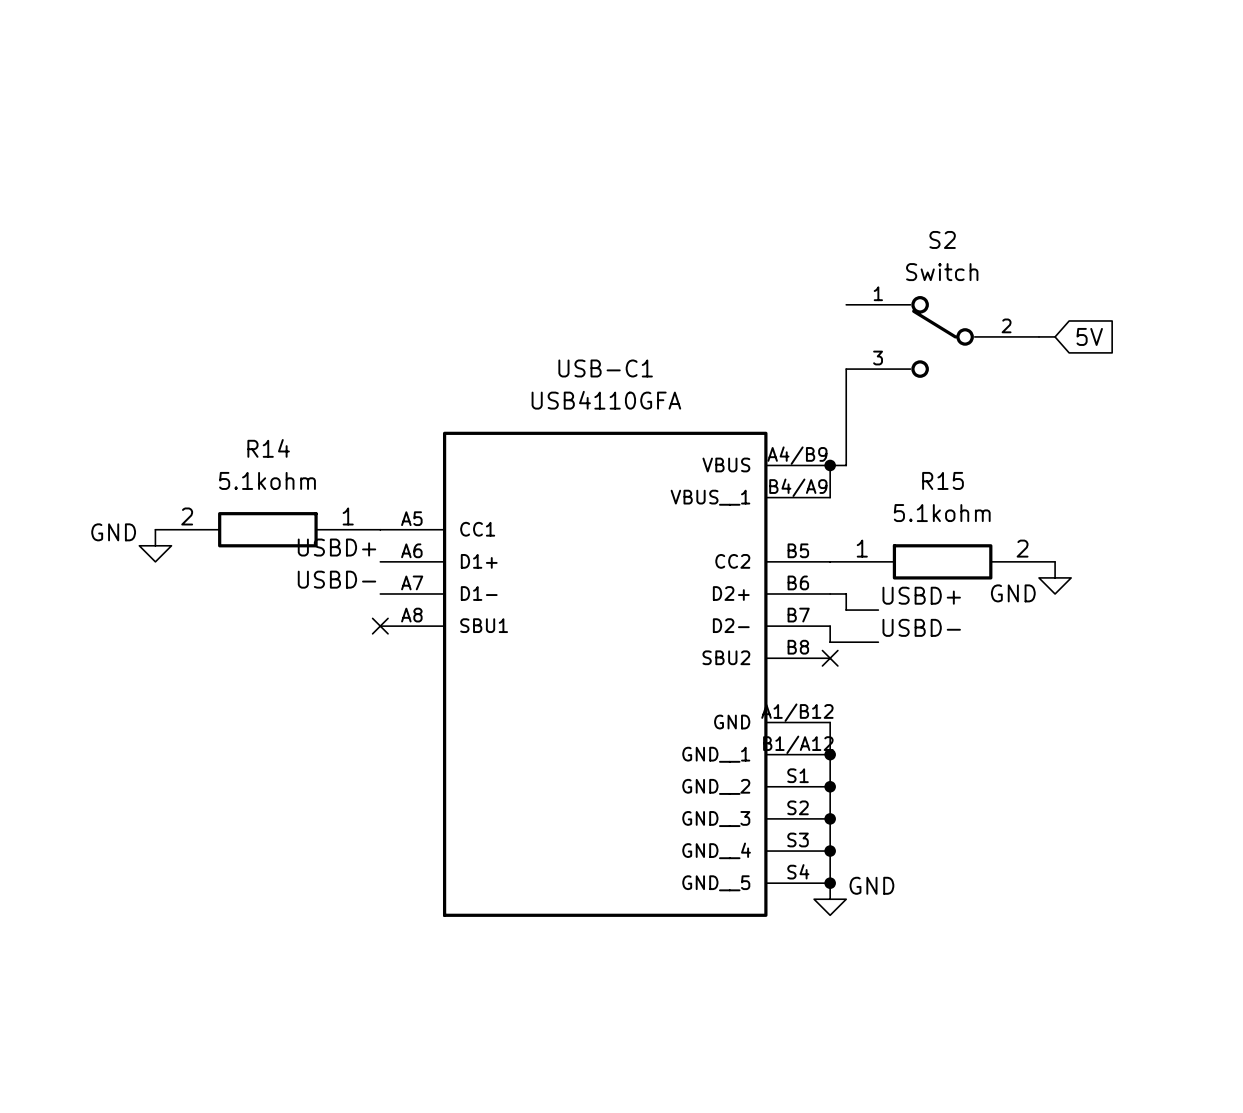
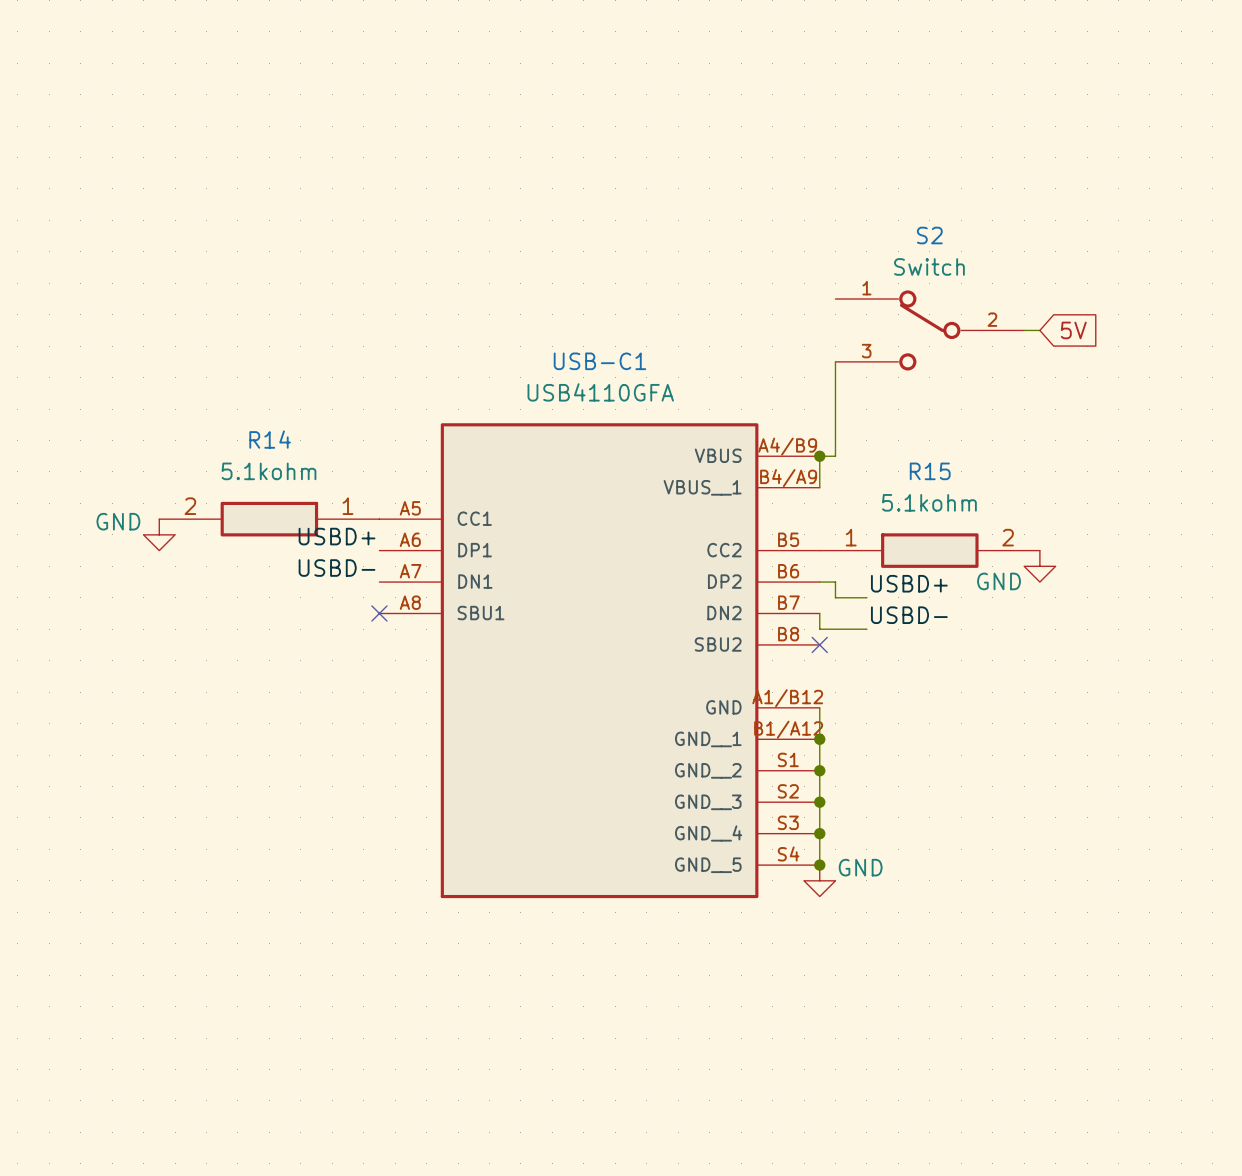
USB-C1 pin name: D1+ (479, 561) -> DP1 (475, 550)
USB-C1 pin name: D1- (479, 593) -> DN1 (475, 581)
USB-C1 pin name: D2+ (731, 593) -> DP2 (724, 581)
USB-C1 pin name: D2- (731, 625) -> DN2 (724, 613)

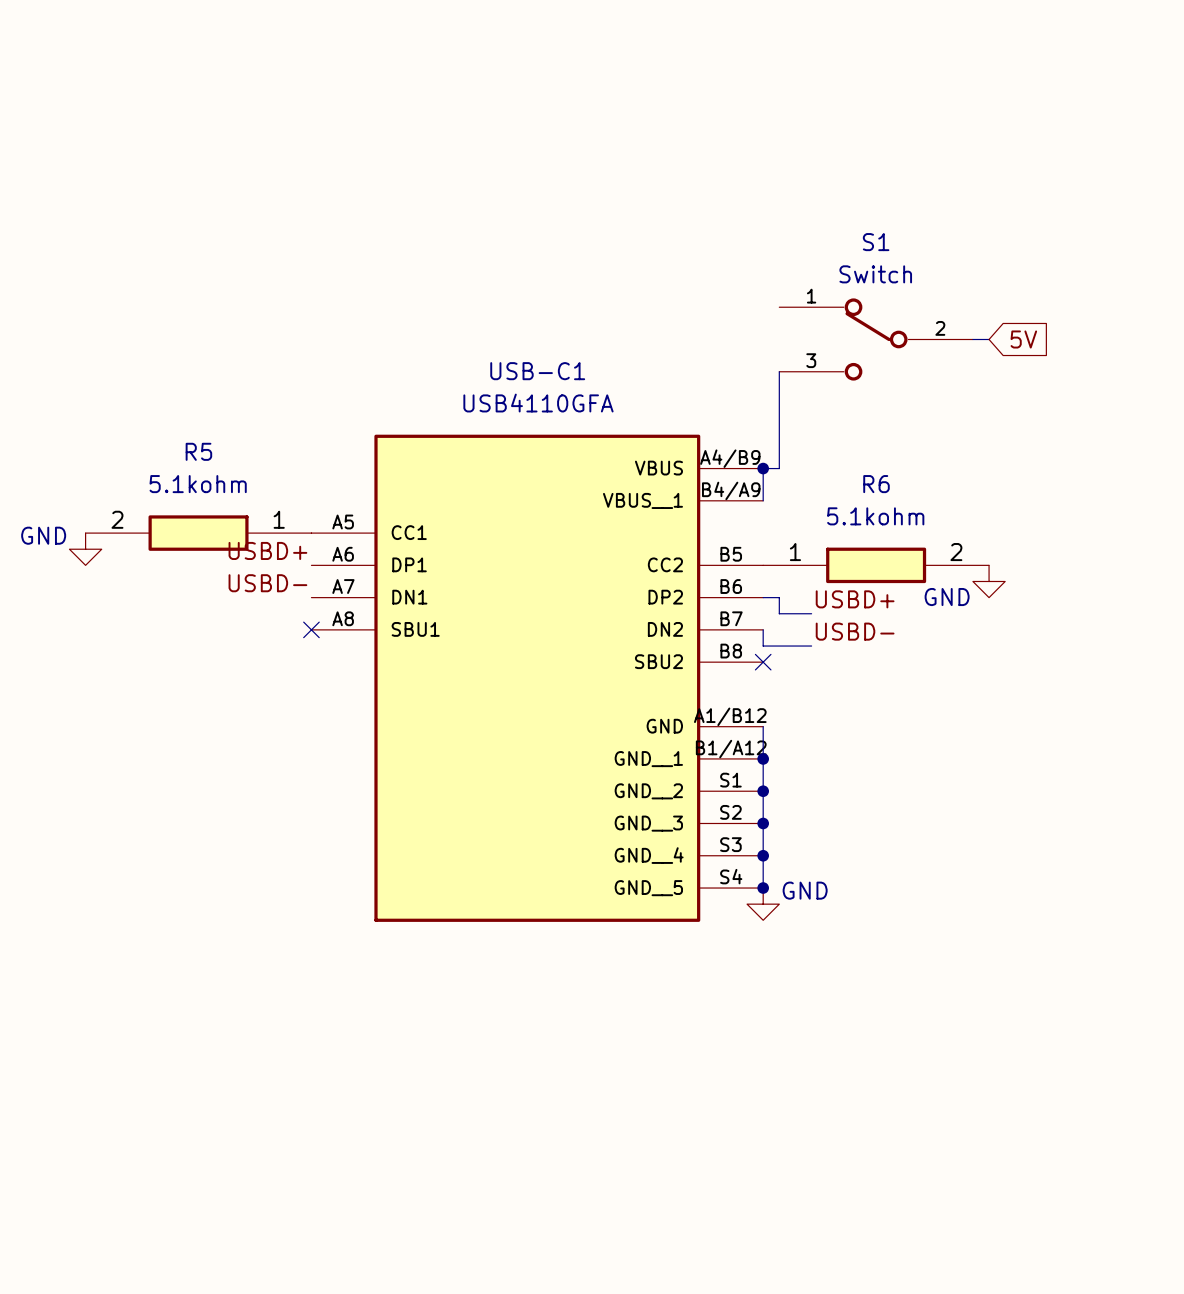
S2 name: S2 (929, 235) -> S1 (876, 242)
R14 name: R14 (270, 439) -> R5 (198, 451)
R15 name: R15 (930, 471) -> R6 (876, 484)

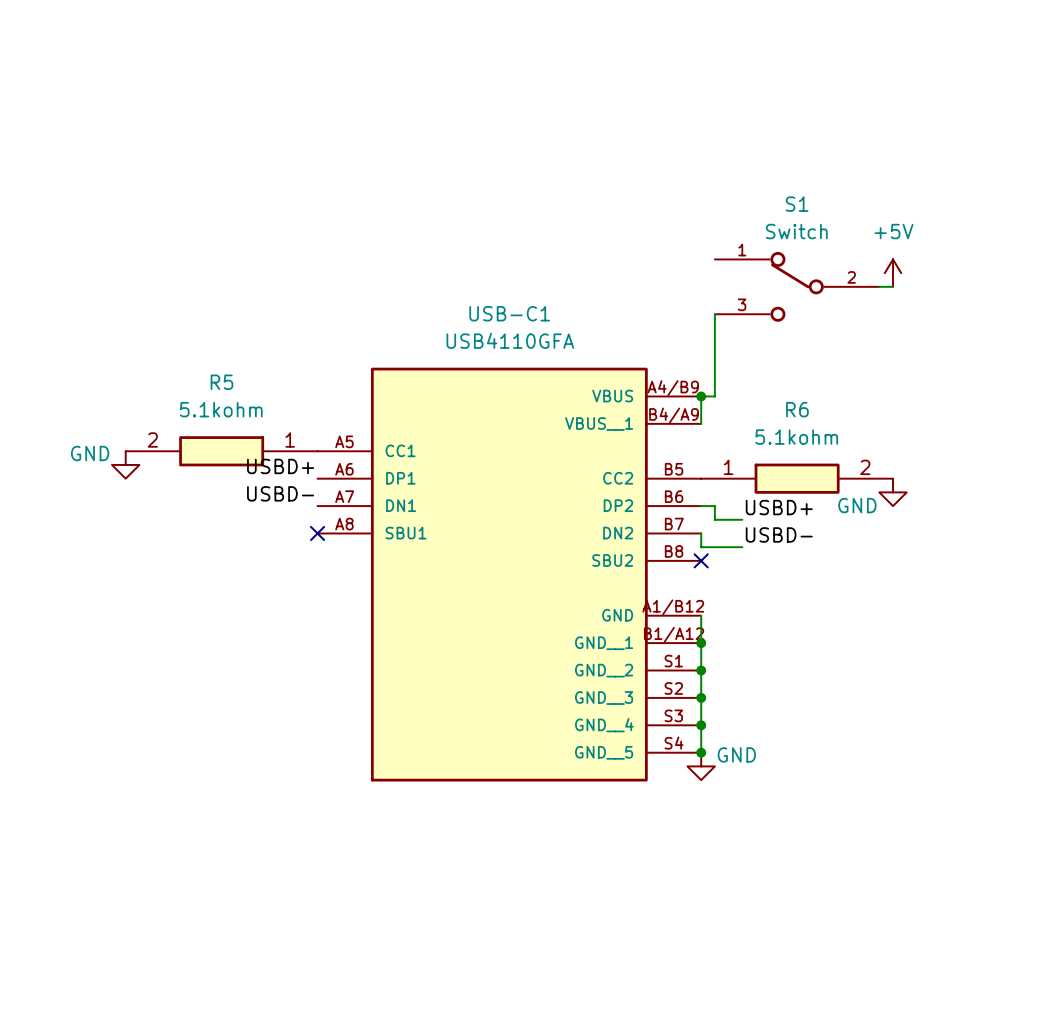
power symbol: none -> +5V (893, 273)
global label: 5V (1023, 339) -> none

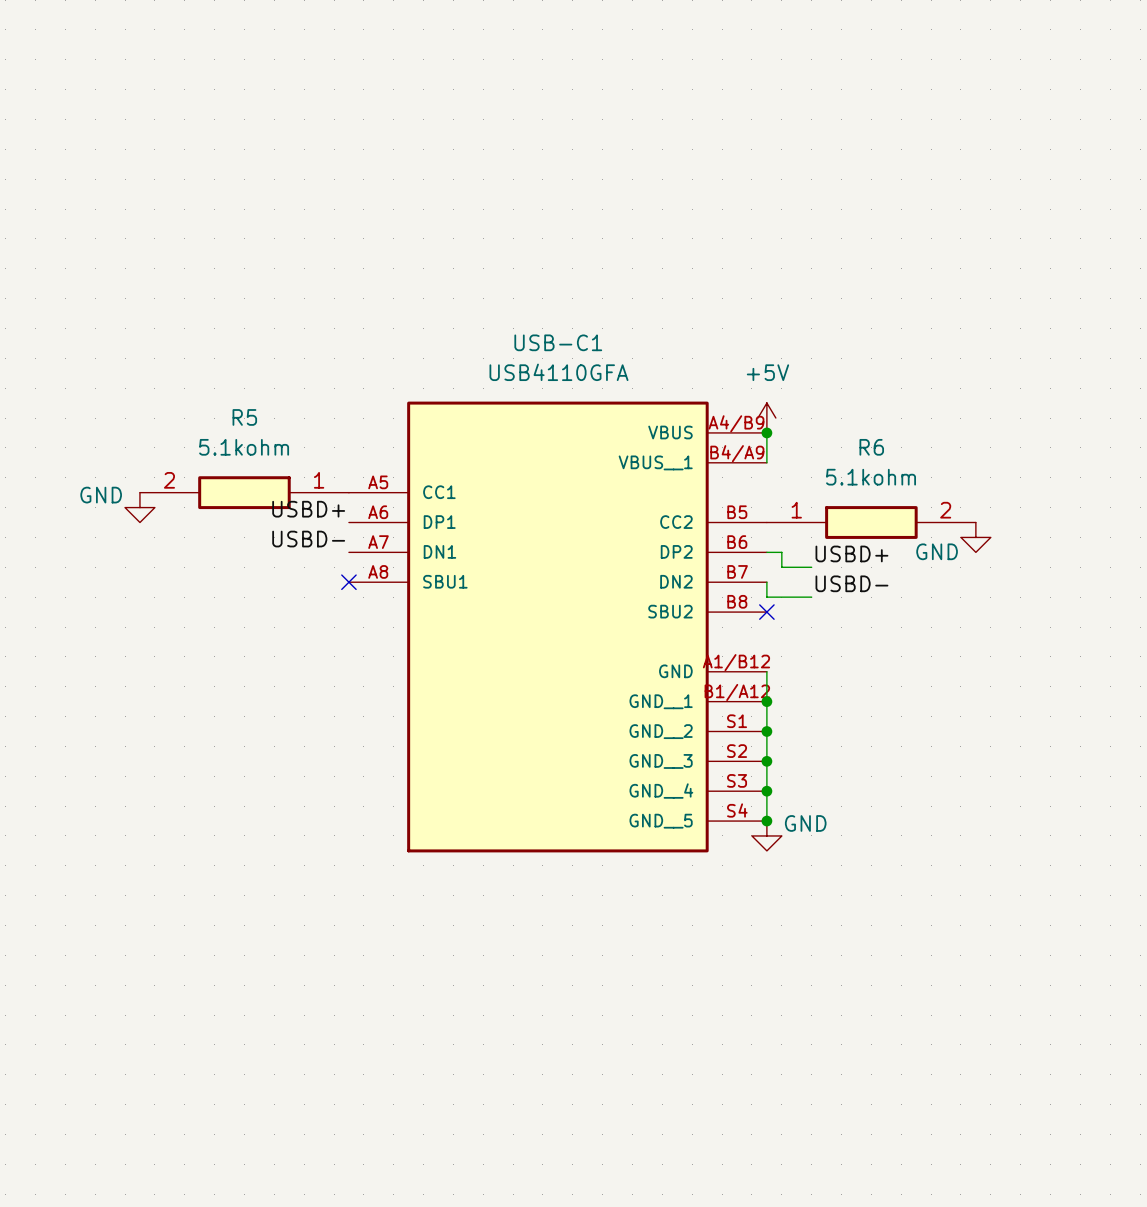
power symbol position: +5V (893, 273) -> +5V (766, 418)
S1: Switch (797, 286) -> none
wire: (879, 286) (893, 286) -> none
wire: (714, 314) (714, 396) (701, 396) -> none

